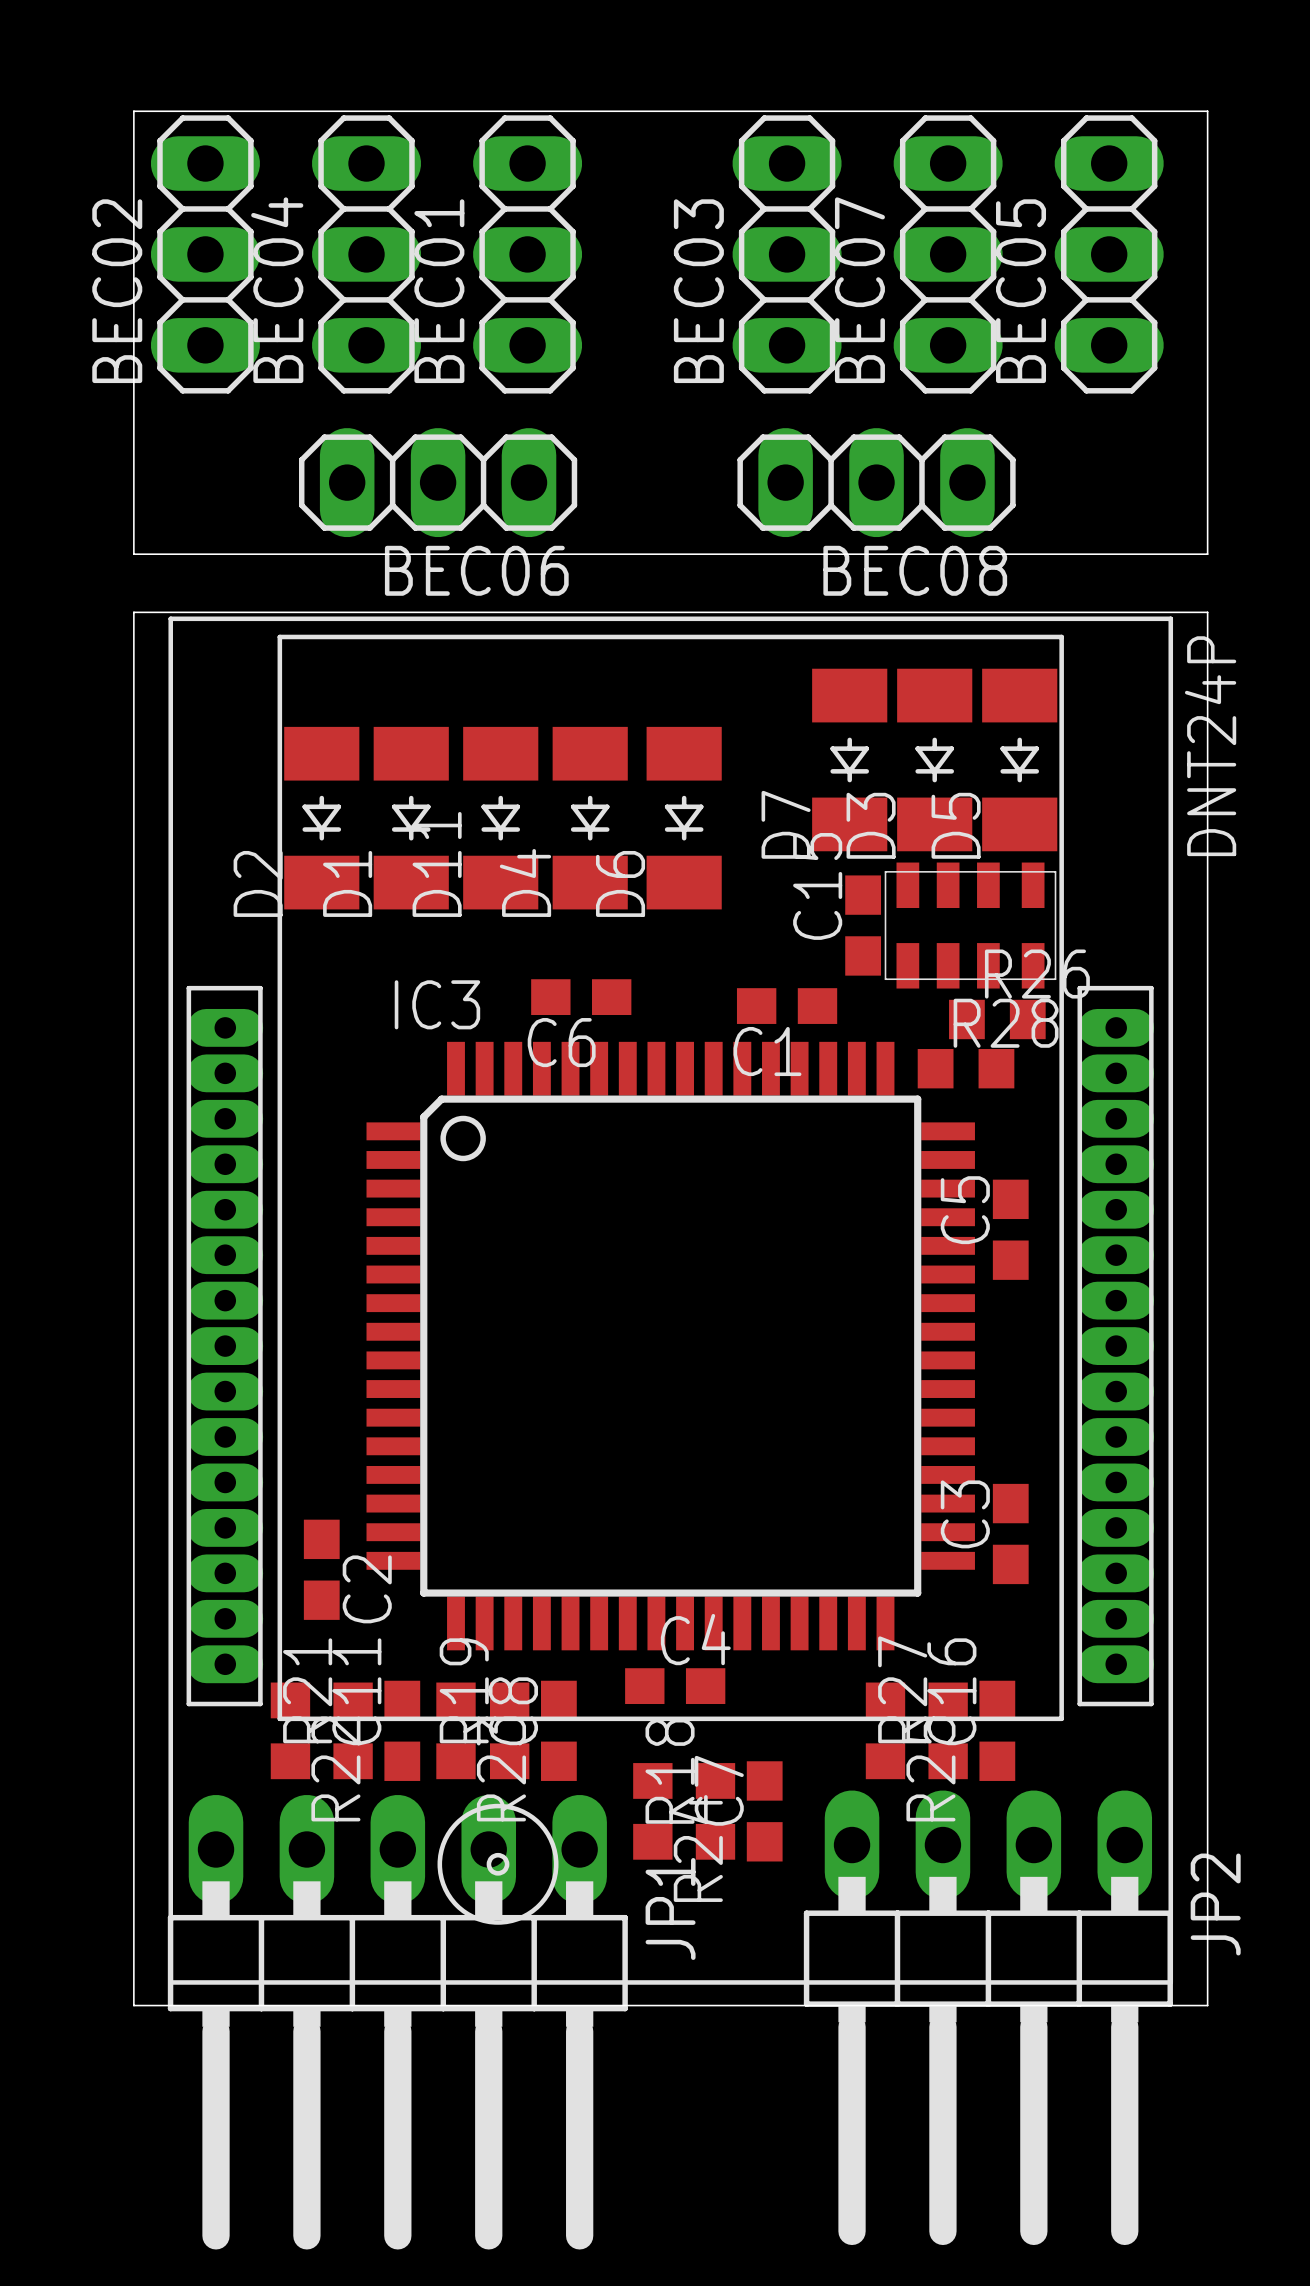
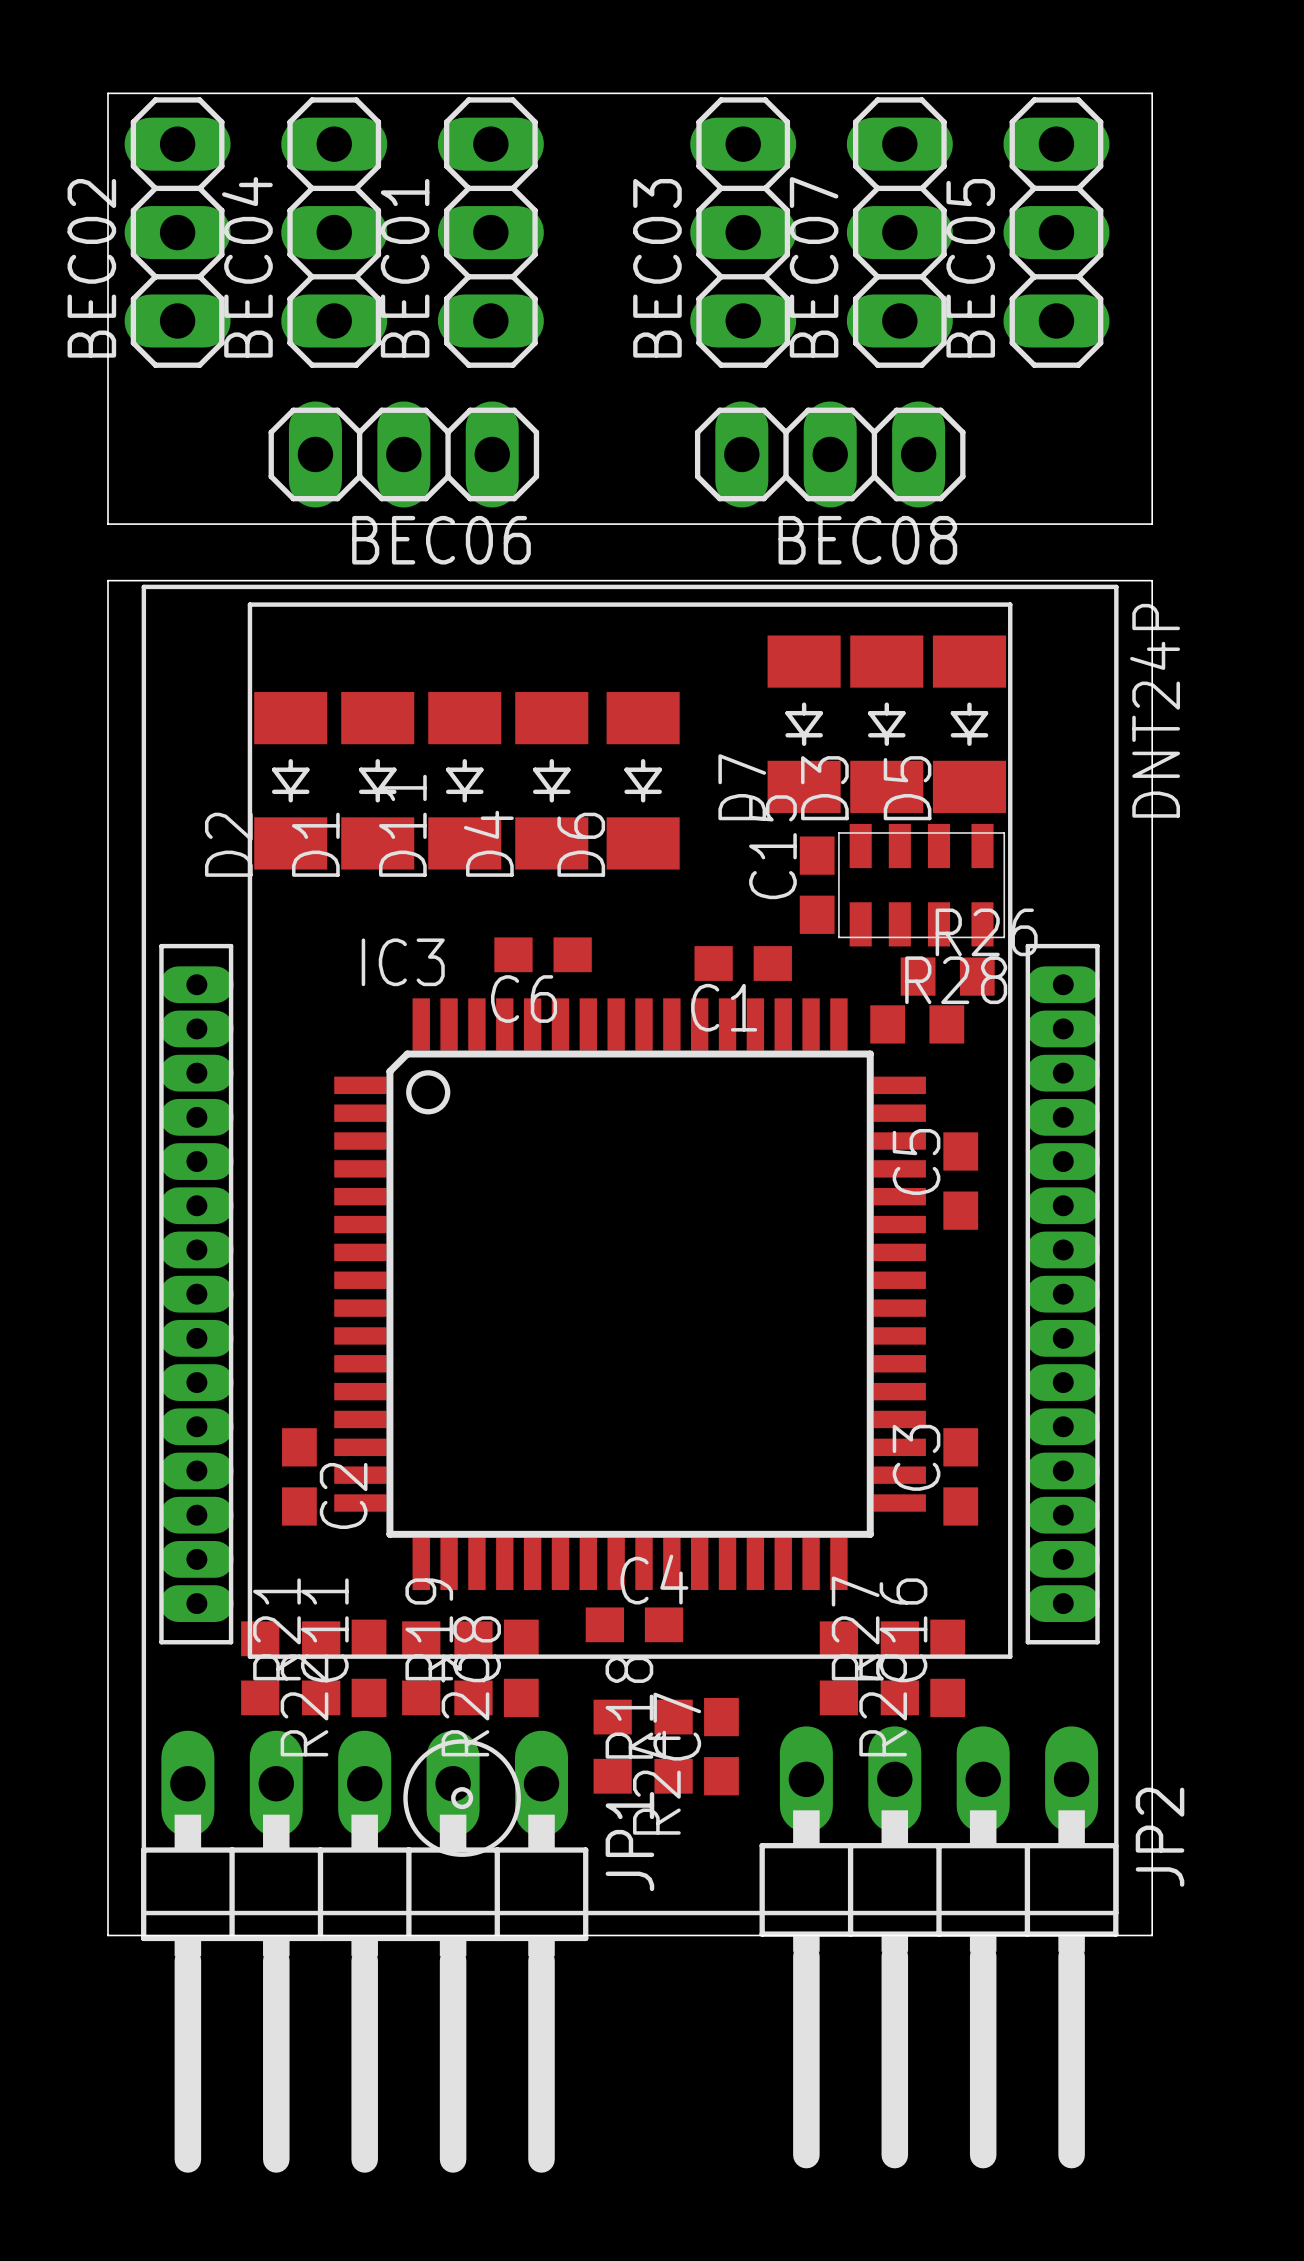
C2 position: (321, 1569) -> (299, 1476)

